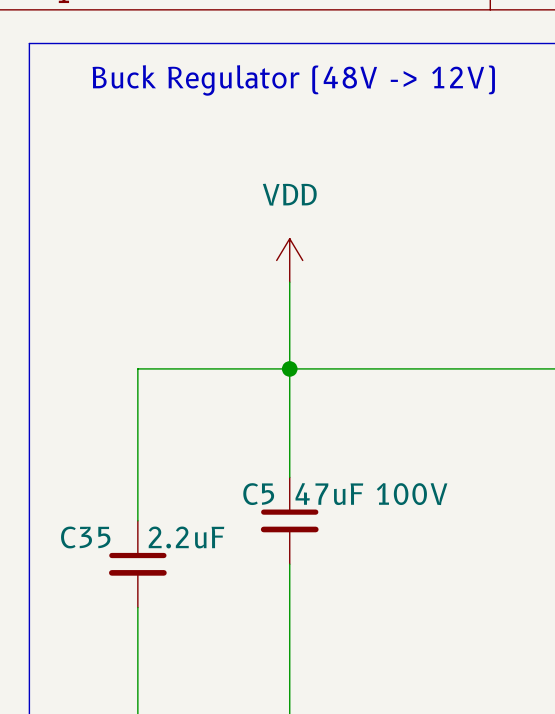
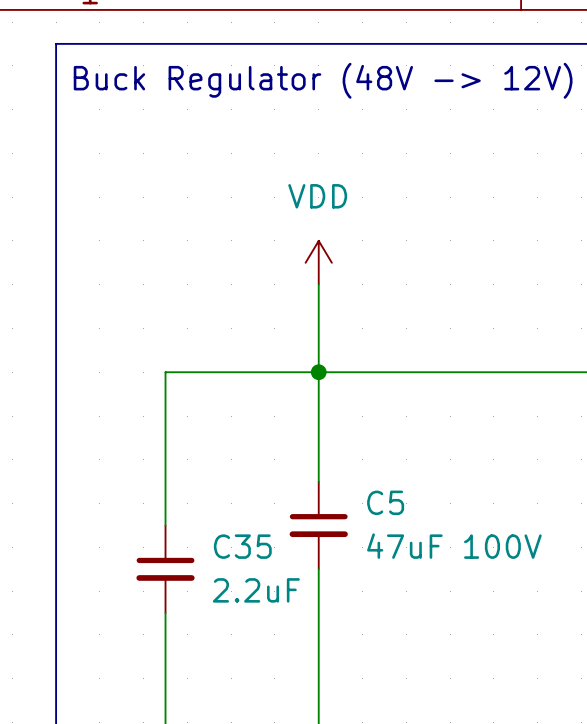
C5 name position: C5 (258, 494) -> C5 (385, 502)
C5 value position: 47uF 100V (371, 494) -> 47uF 100V (454, 546)
C35 name position: C35 (85, 537) -> C35 (242, 546)
C35 value position: 2.2uF (186, 537) -> 2.2uF (256, 590)

